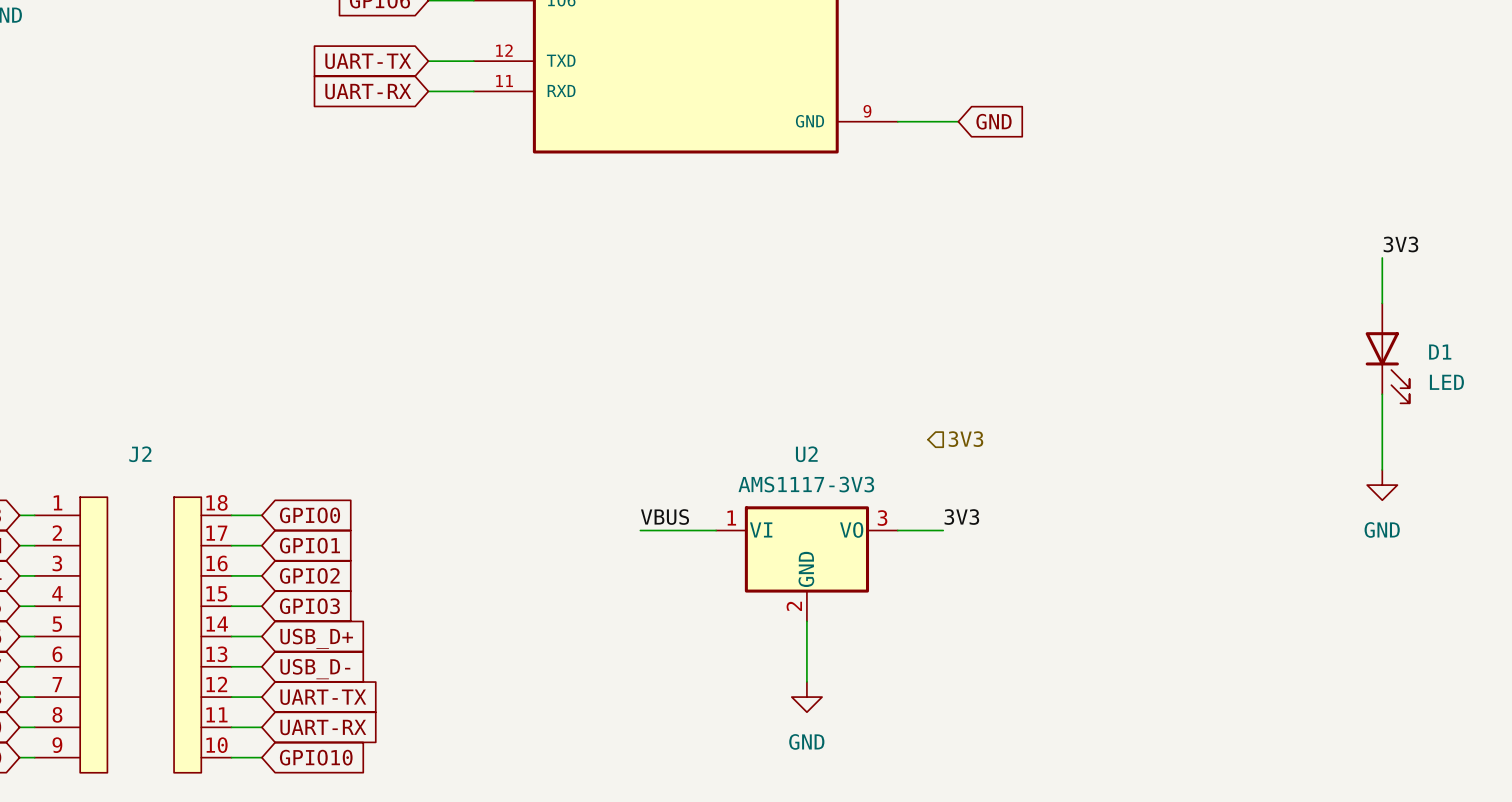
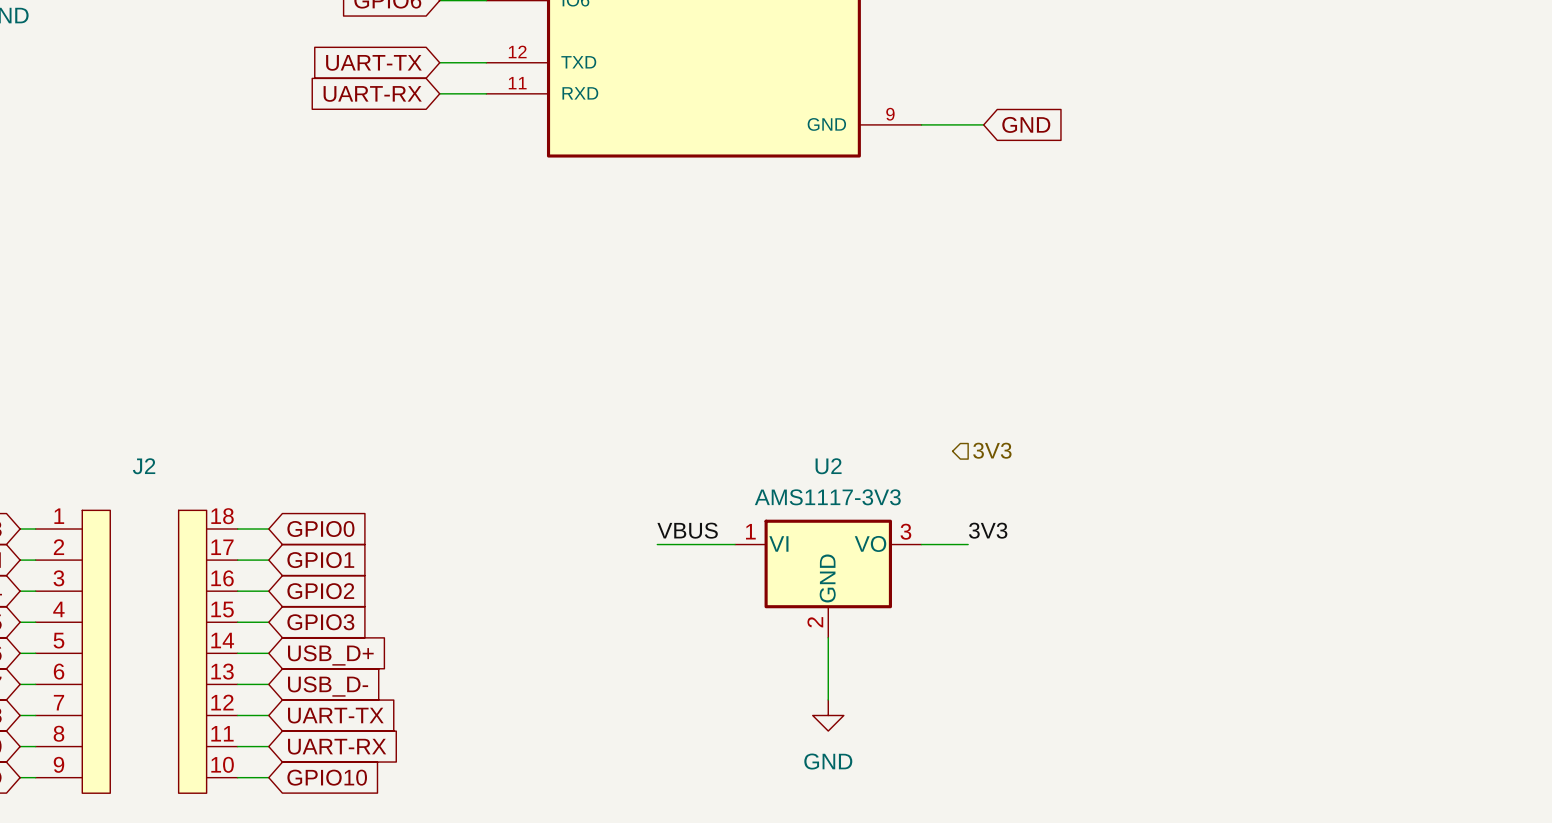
label: 3V3 (1400, 244) -> none
wire: (1382, 257) (1382, 303) -> none
D1: LED (1387, 353) -> none
wire: (1382, 394) (1382, 469) -> none
power symbol: GND (1382, 485) -> none

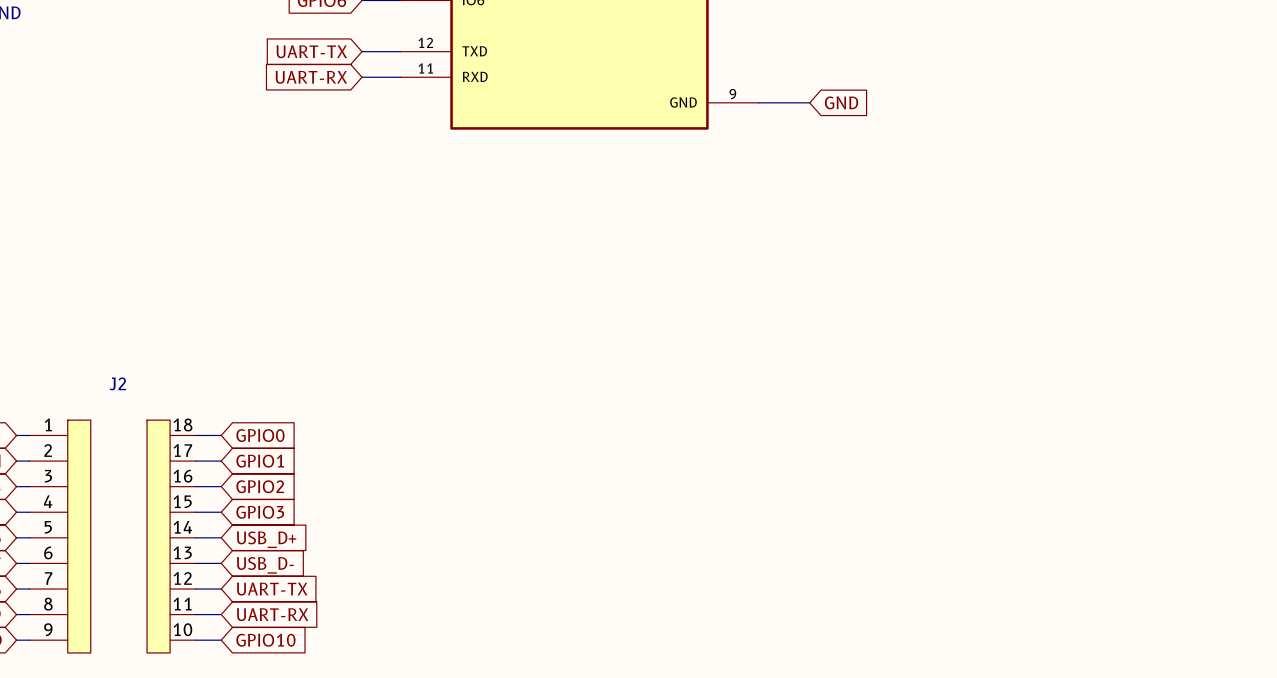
hierarchical label: 3V3 (992, 450) -> none
label: VBUS (687, 530) -> none
label: 3V3 (988, 530) -> none
wire: (657, 544) (735, 544) -> none
wire: (921, 544) (968, 544) -> none
U2: AMS1117-3V3 (828, 578) -> none
wire: (828, 637) (828, 699) -> none
power symbol: GND (828, 715) -> none

